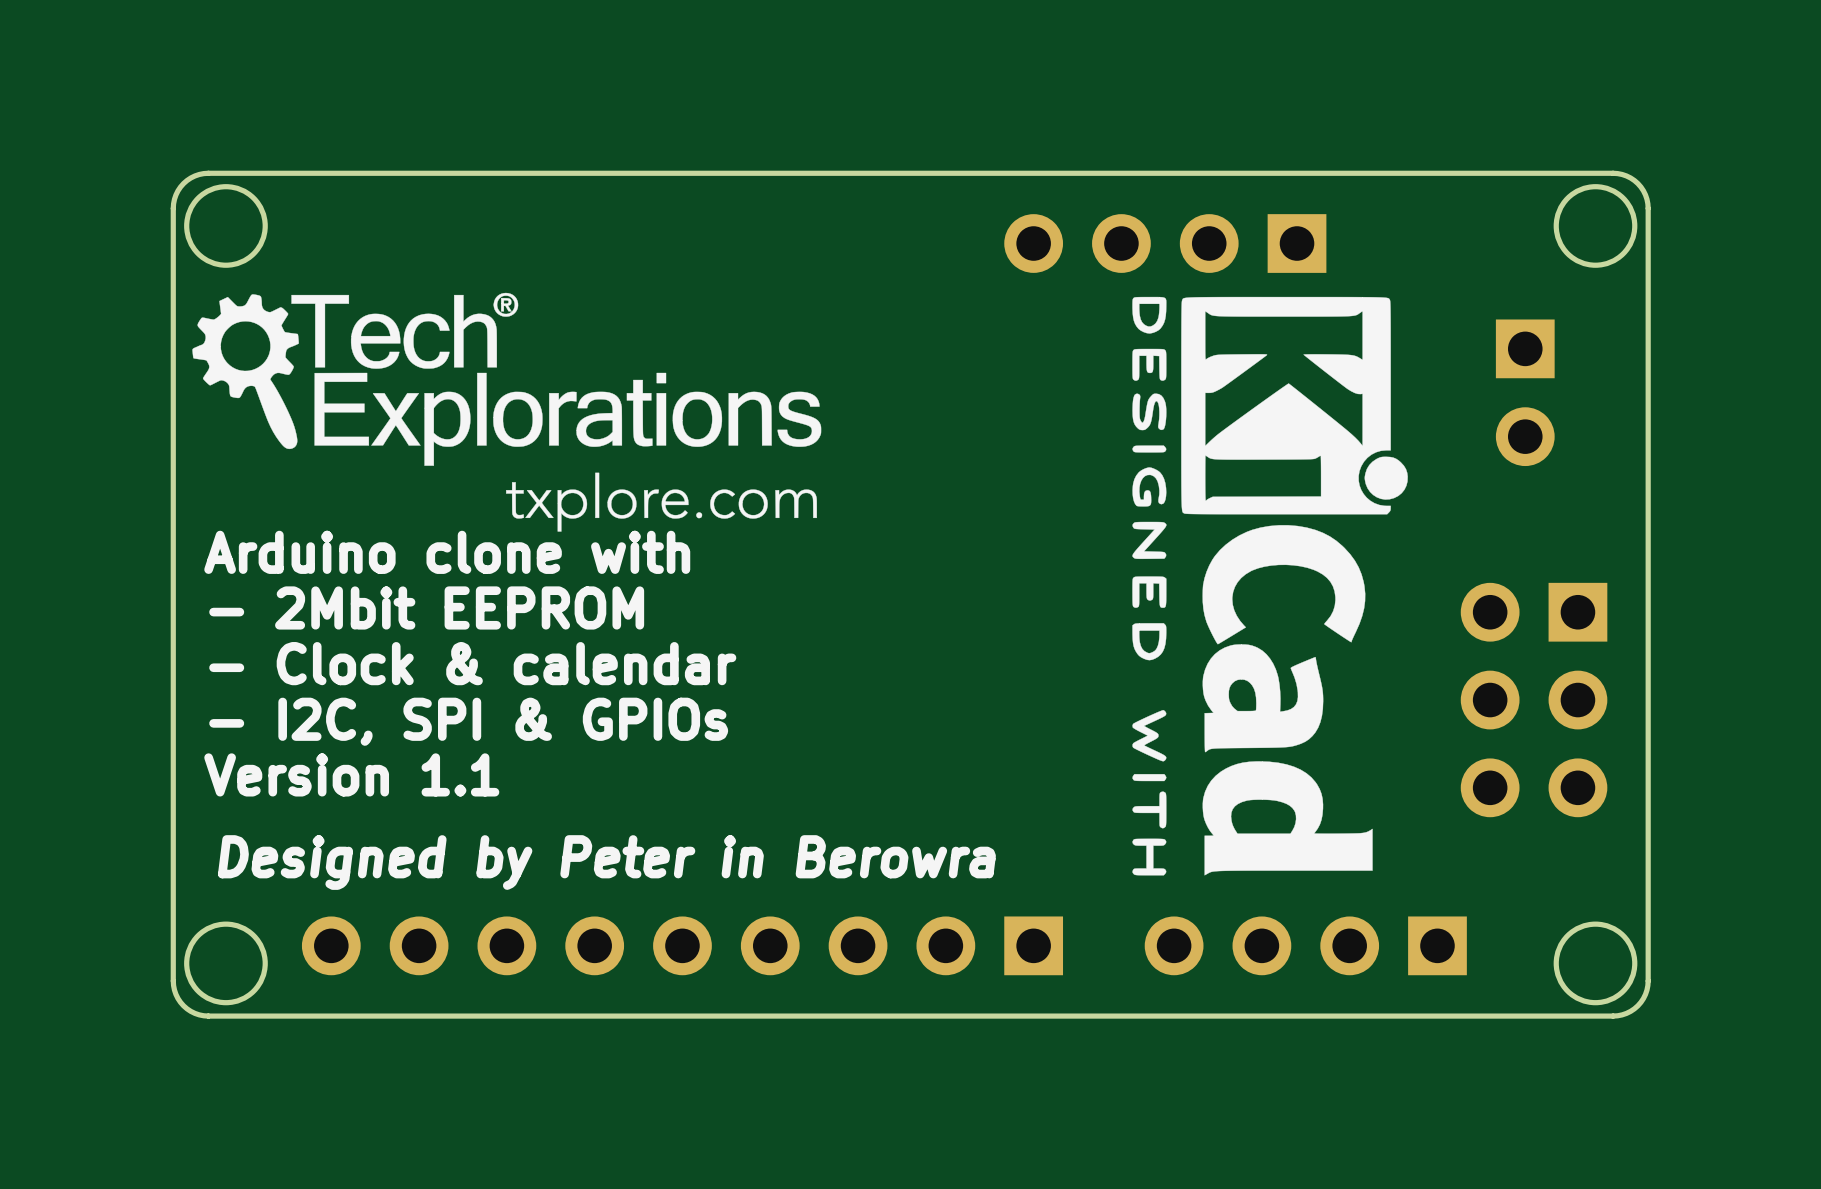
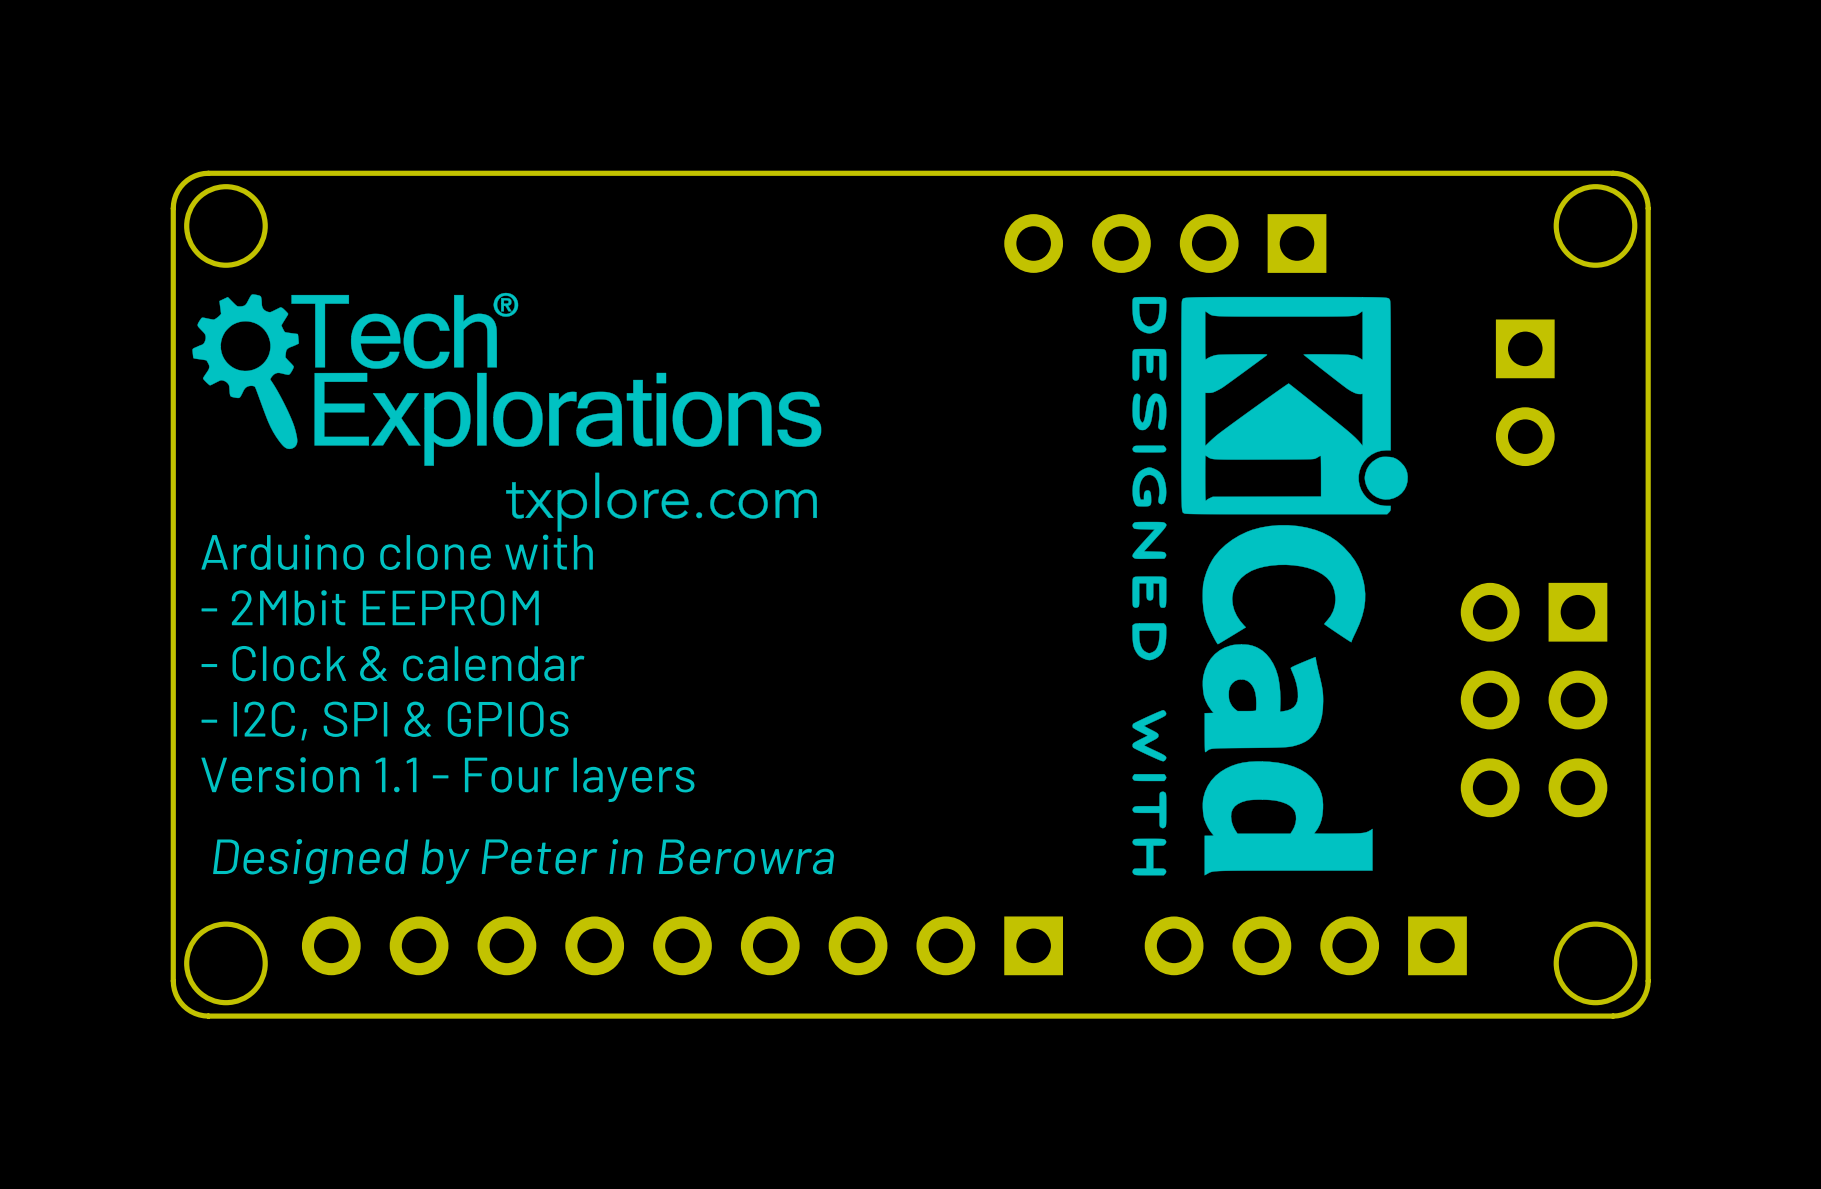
text: Version 1.1 (351, 774) -> Version 1.1 - Four layers (447, 779)

